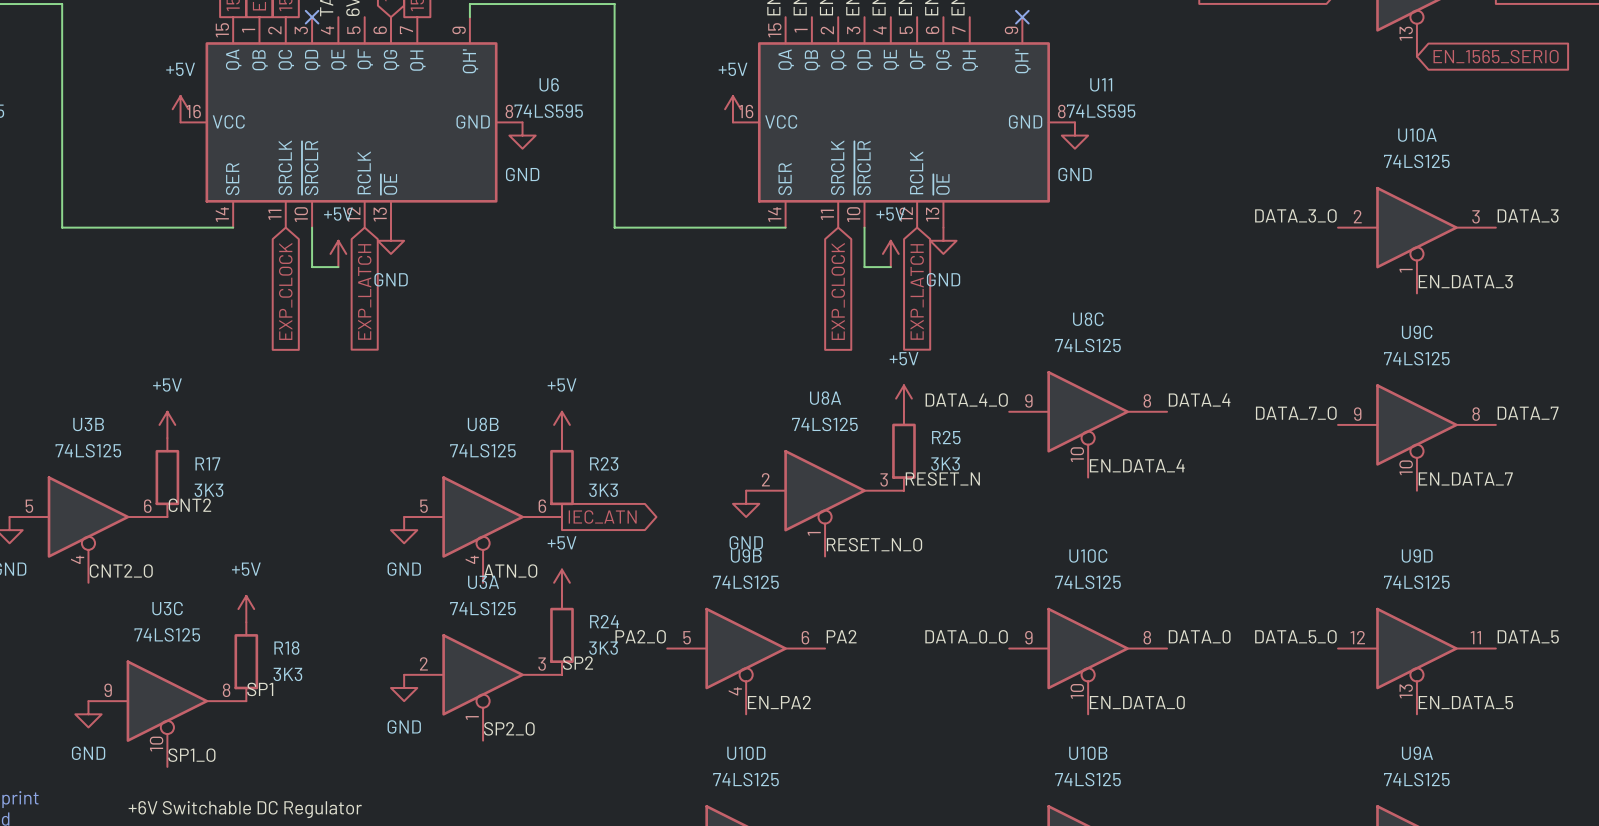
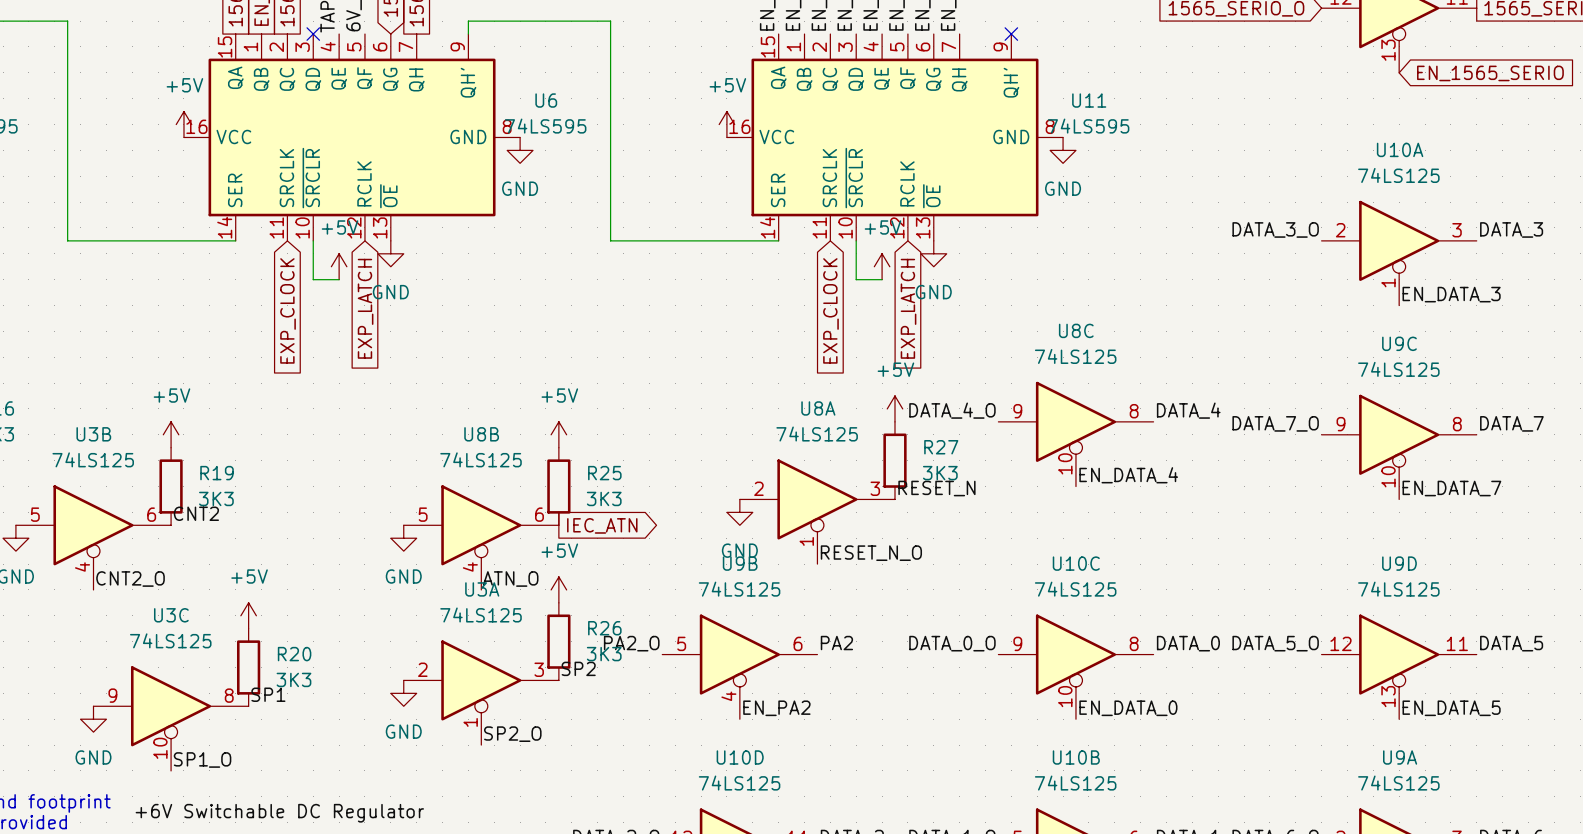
R25 name: R25 (946, 437) -> R27 (941, 447)
R17 name: R17 (207, 463) -> R19 (217, 473)
R23 name: R23 (604, 463) -> R25 (604, 473)
R24 name: R24 (604, 621) -> R26 (604, 628)
R18 name: R18 (286, 648) -> R20 (294, 654)

